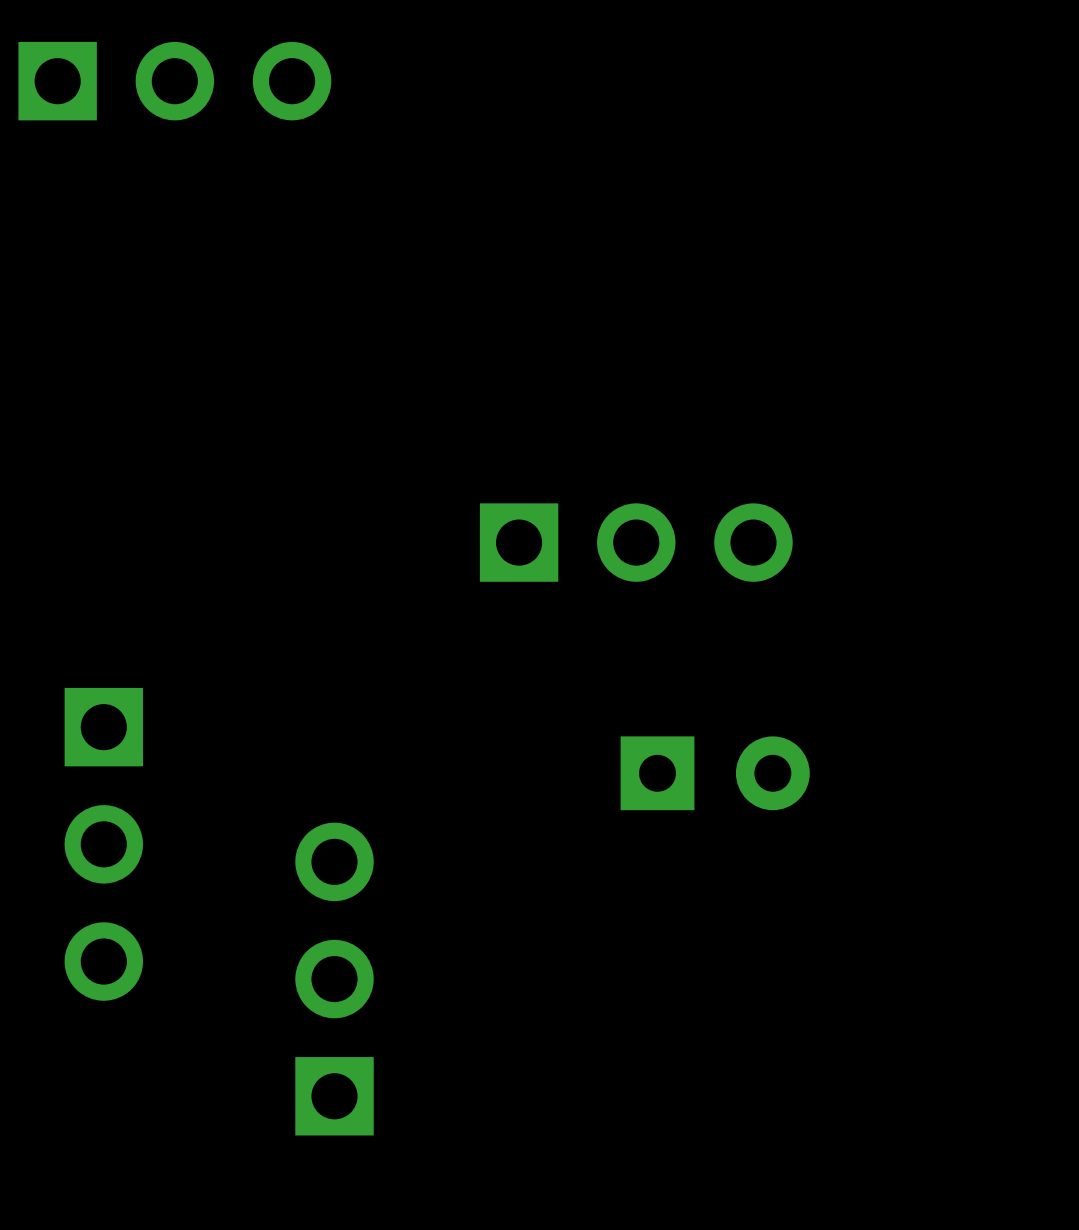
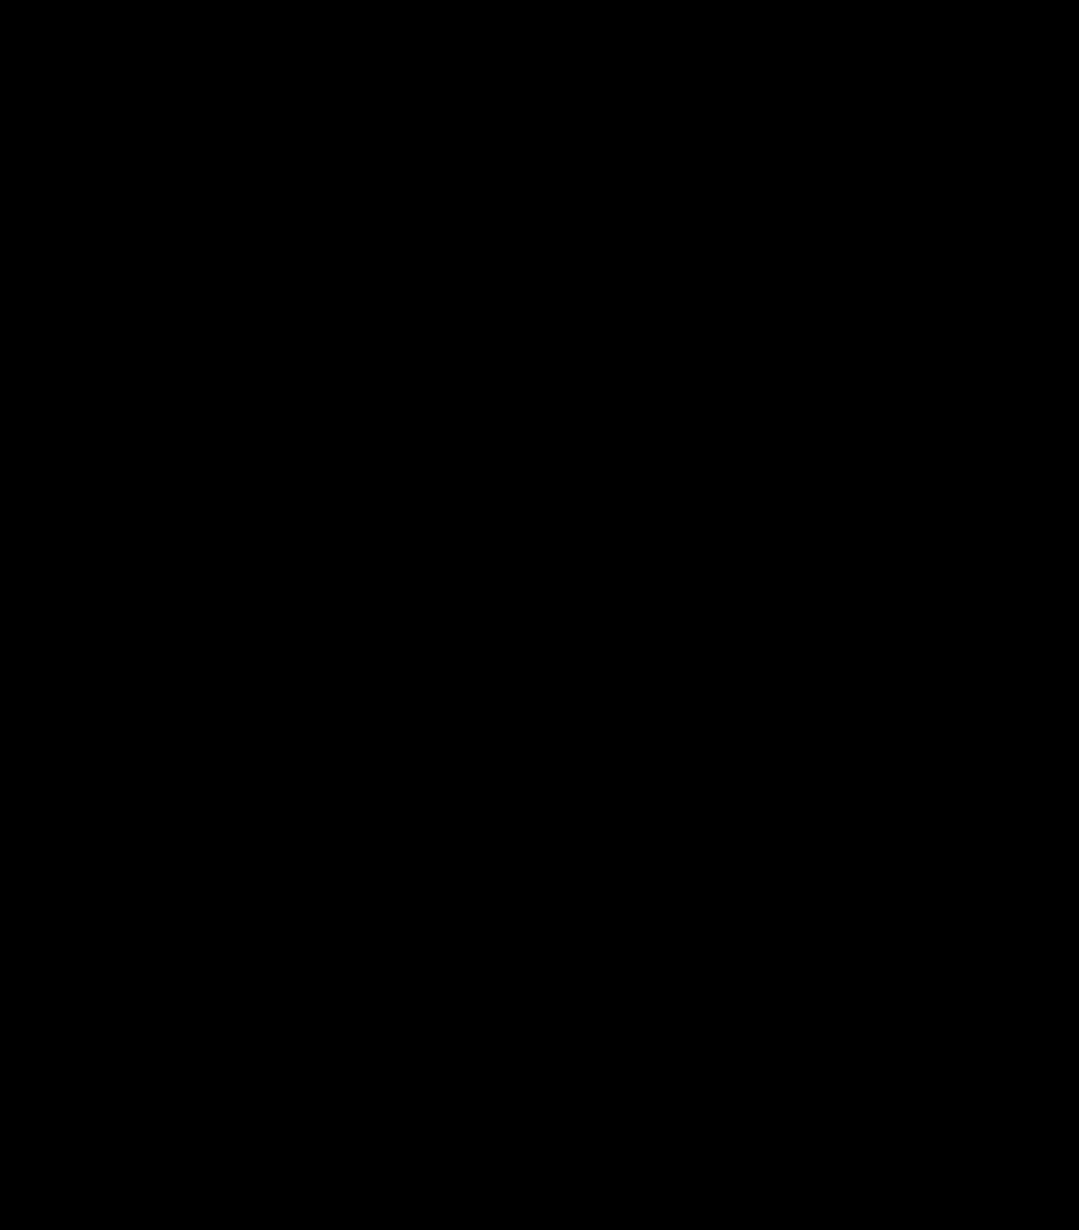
part: (174, 81) -> none
part: (636, 542) -> none
part: (715, 773) -> none
part: (103, 844) -> none
part: (334, 979) -> none

